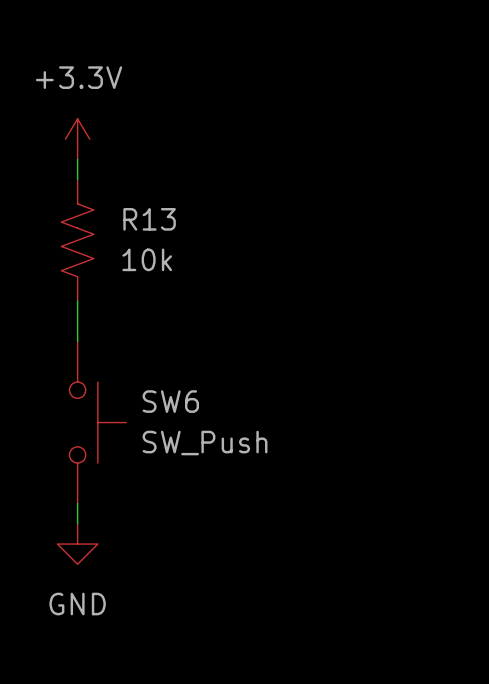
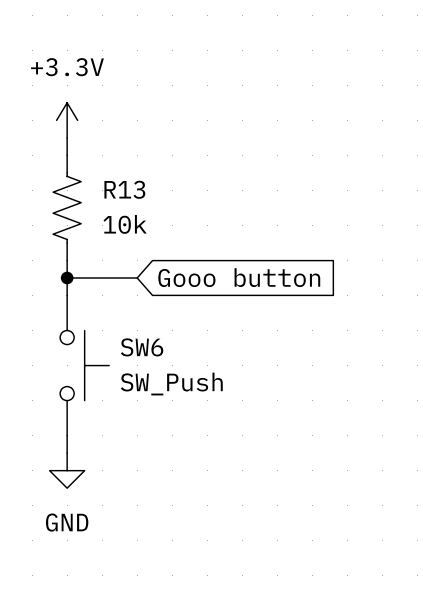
wire: none -> (67, 277) (137, 277)
junction: none -> (67, 277)
global label: none -> Gooo button (239, 277)

